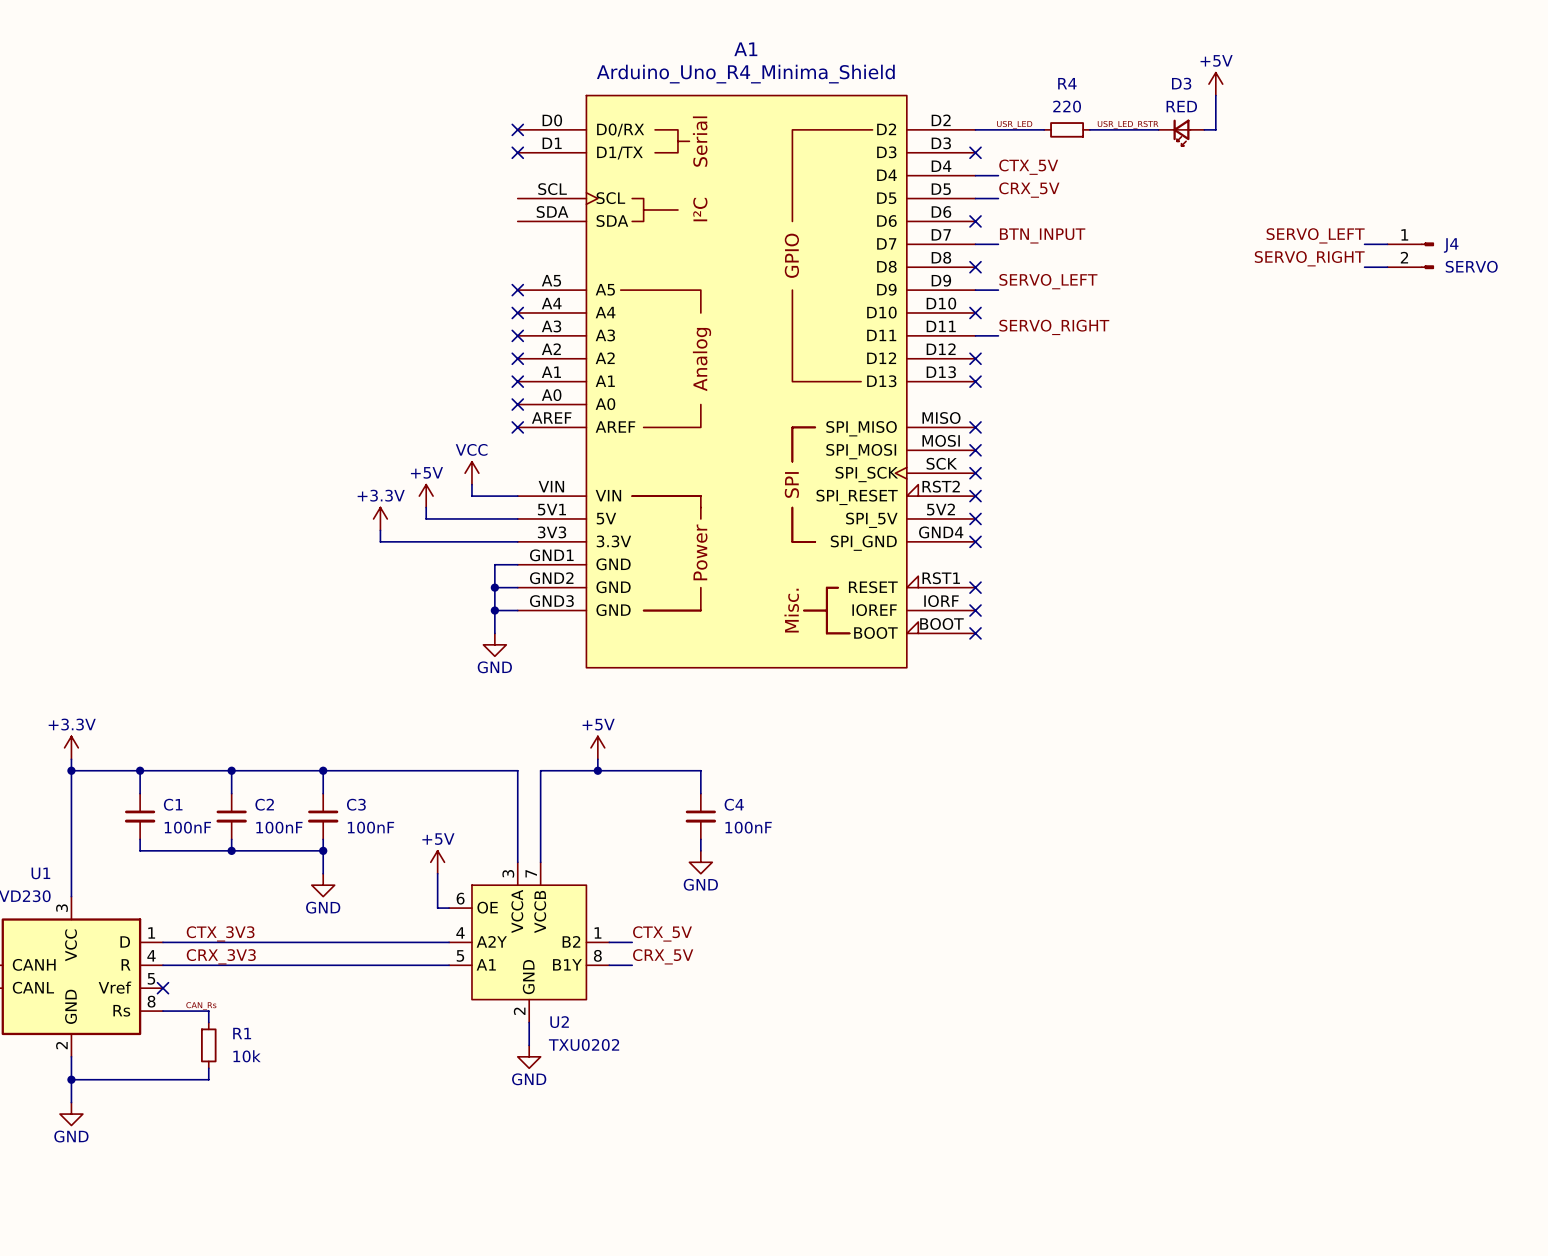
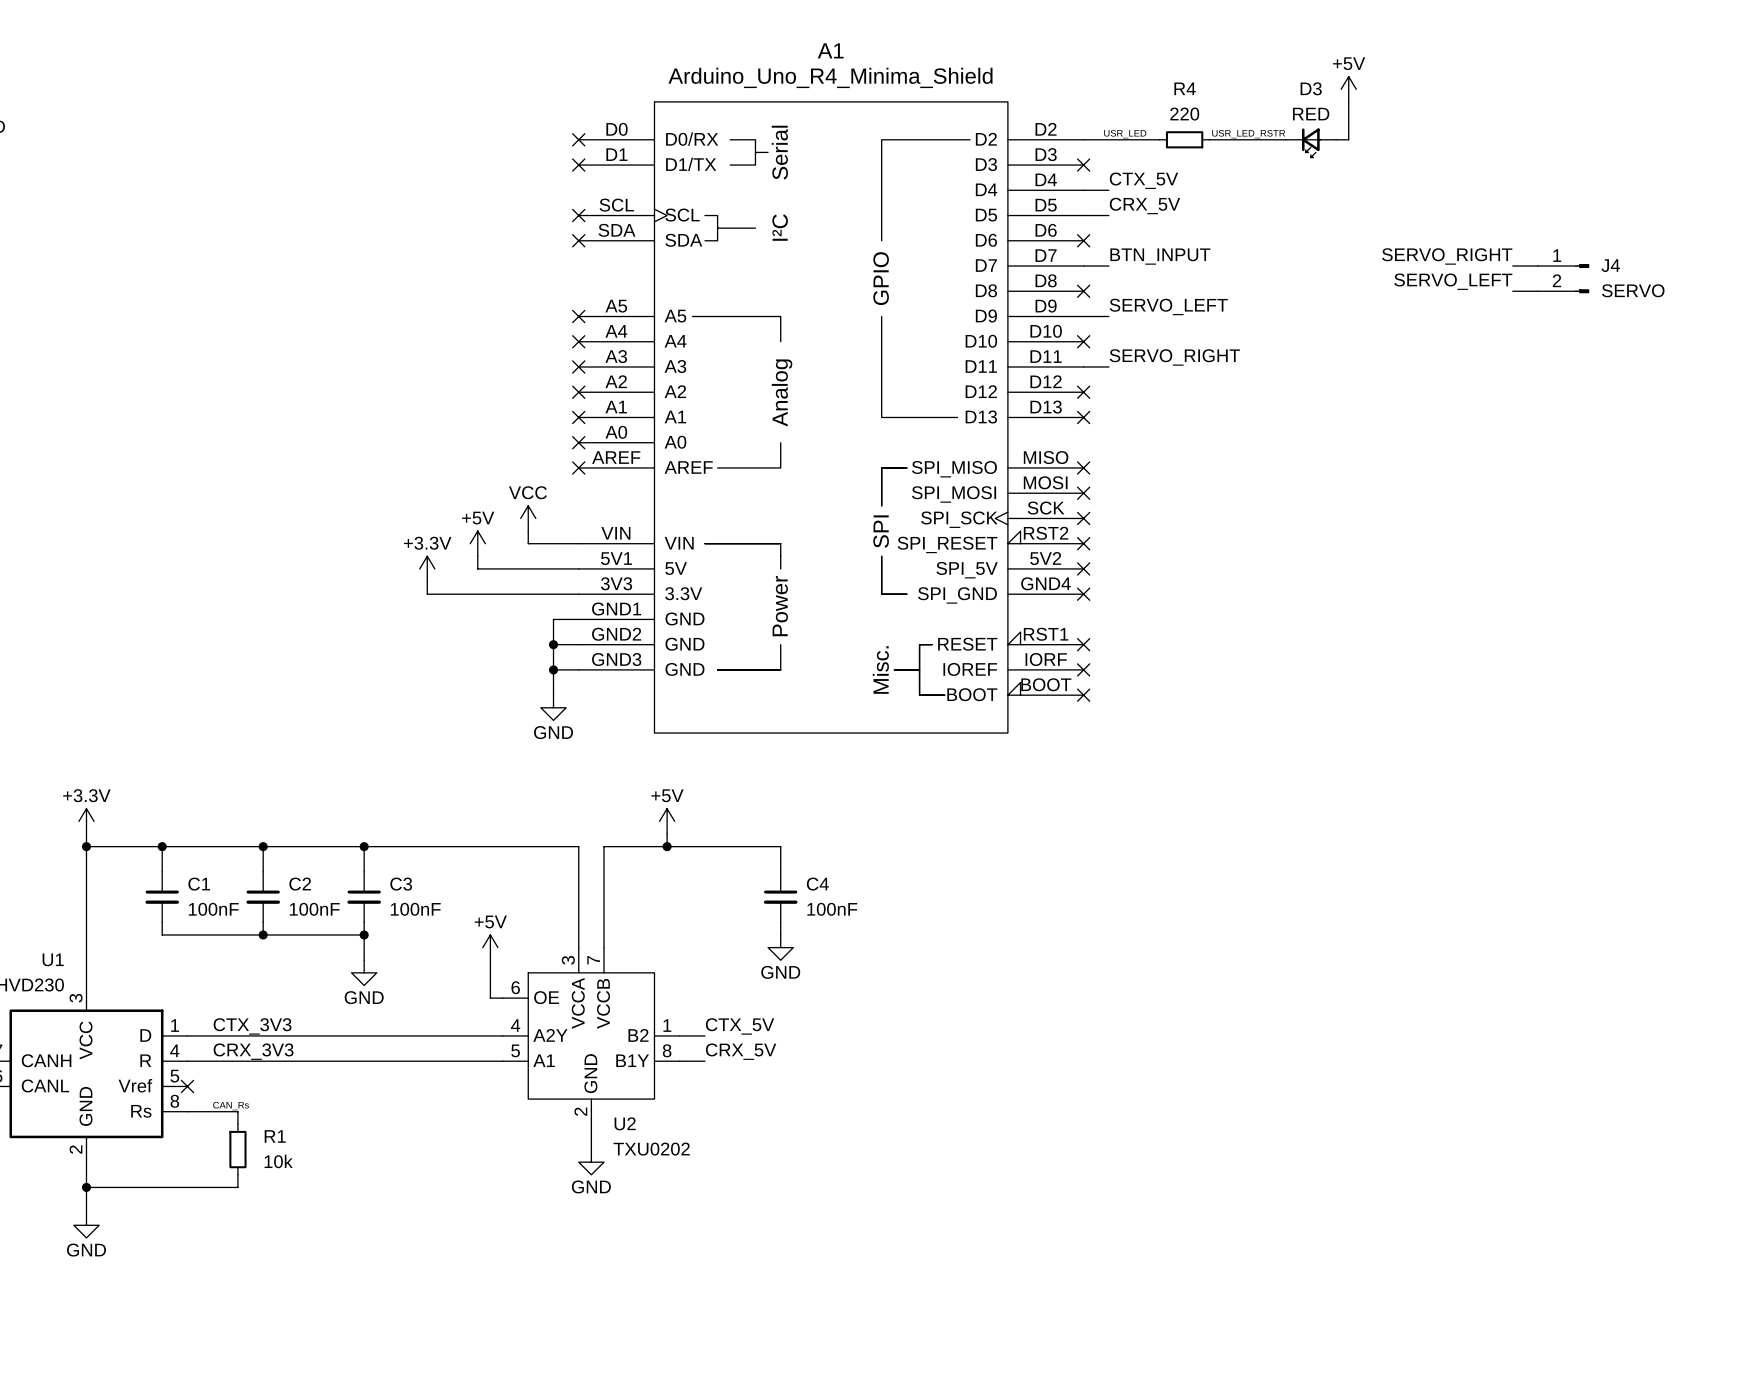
no-connect mark: none -> (578, 215)
no-connect mark: none -> (578, 240)
label: SERVO_LEFT (1315, 235) -> SERVO_RIGHT (1447, 256)
label: SERVO_RIGHT (1309, 258) -> SERVO_LEFT (1453, 281)

